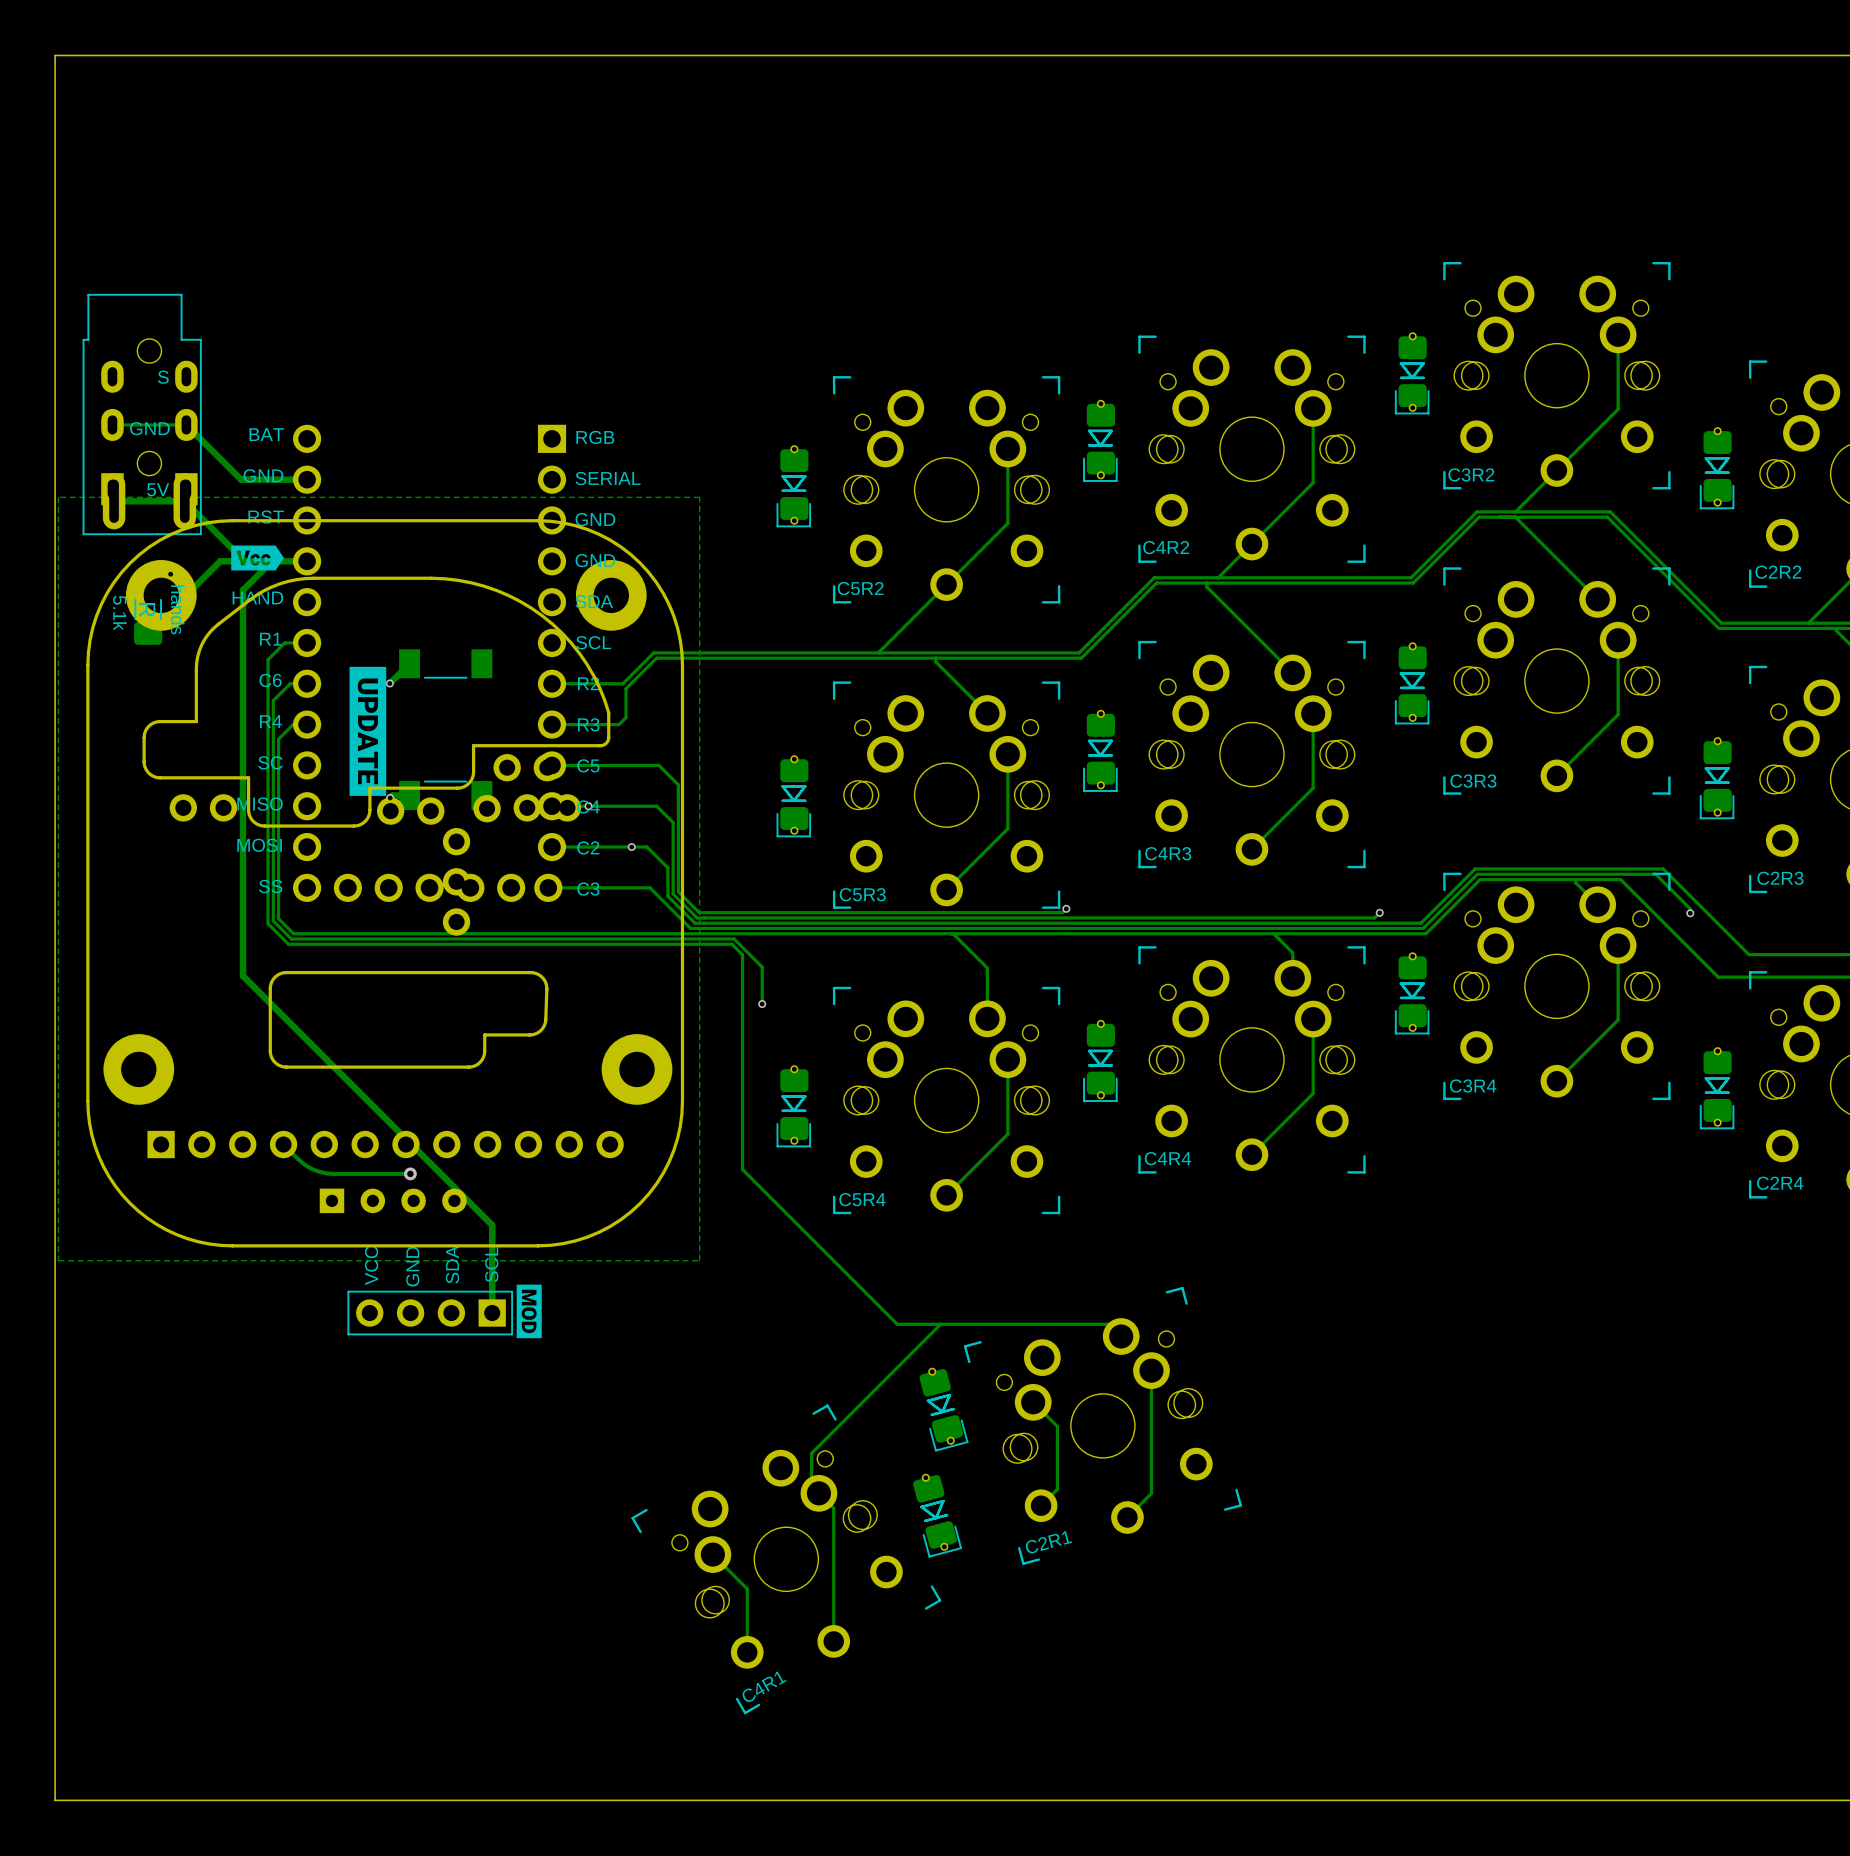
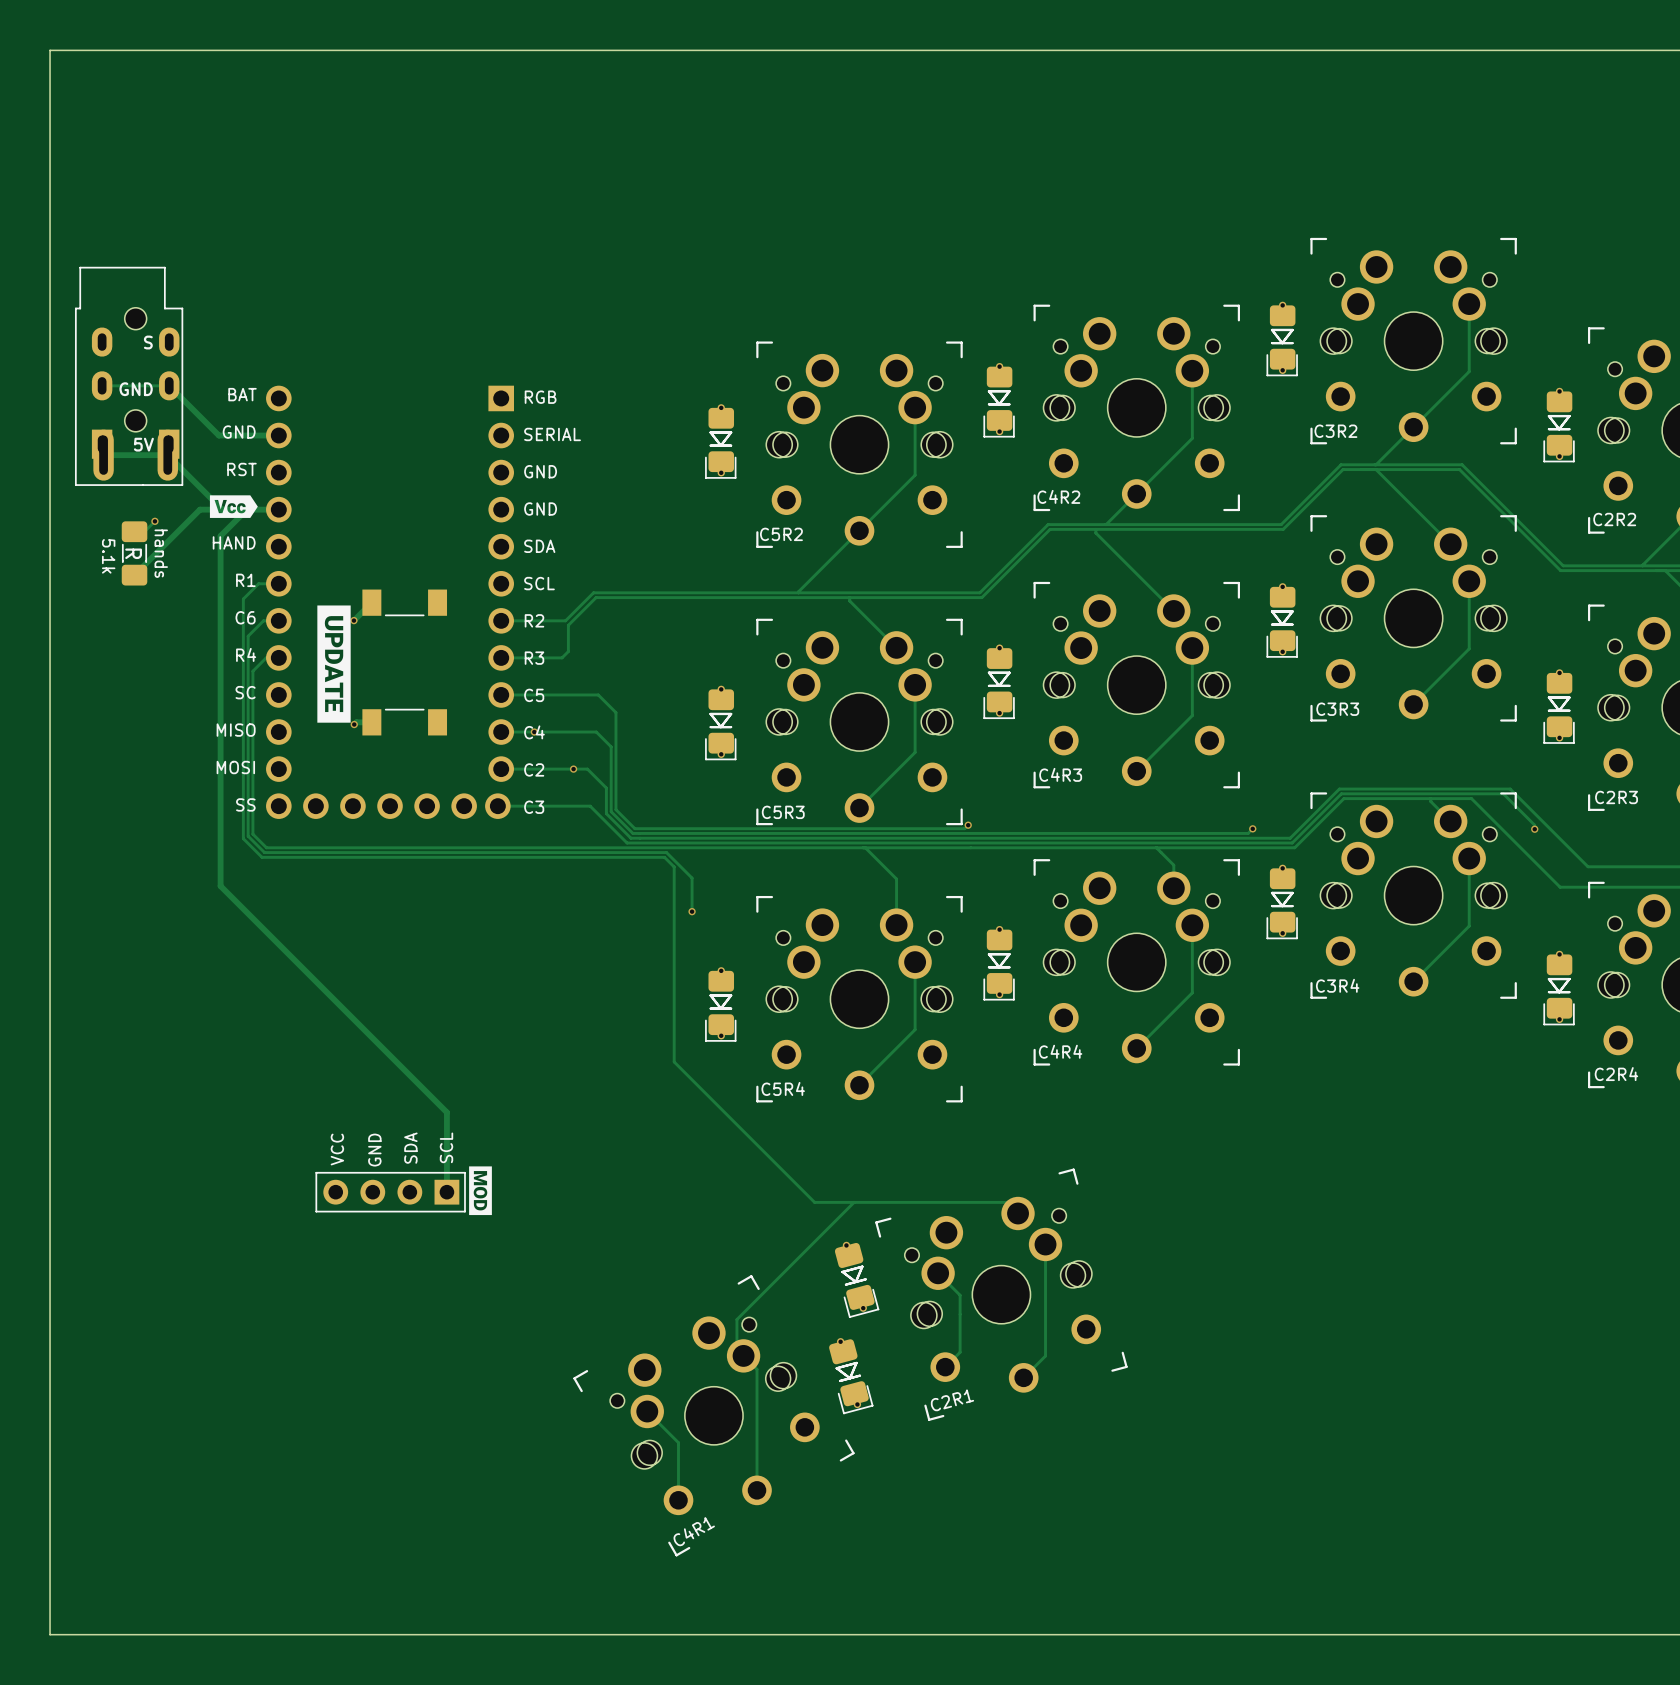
zone outline: (699, 497) (699, 1260) (58, 1260) (58, 497) (699, 497) -> none
part: (161, 595) -> none
part: (611, 595) -> none
part: (385, 883) -> none
part: (138, 1069) -> none
part: (637, 1069) -> none
track: (283, 1144) (303, 1163) (320, 1172) (410, 1173) -> none
via: (410, 1173) -> none

